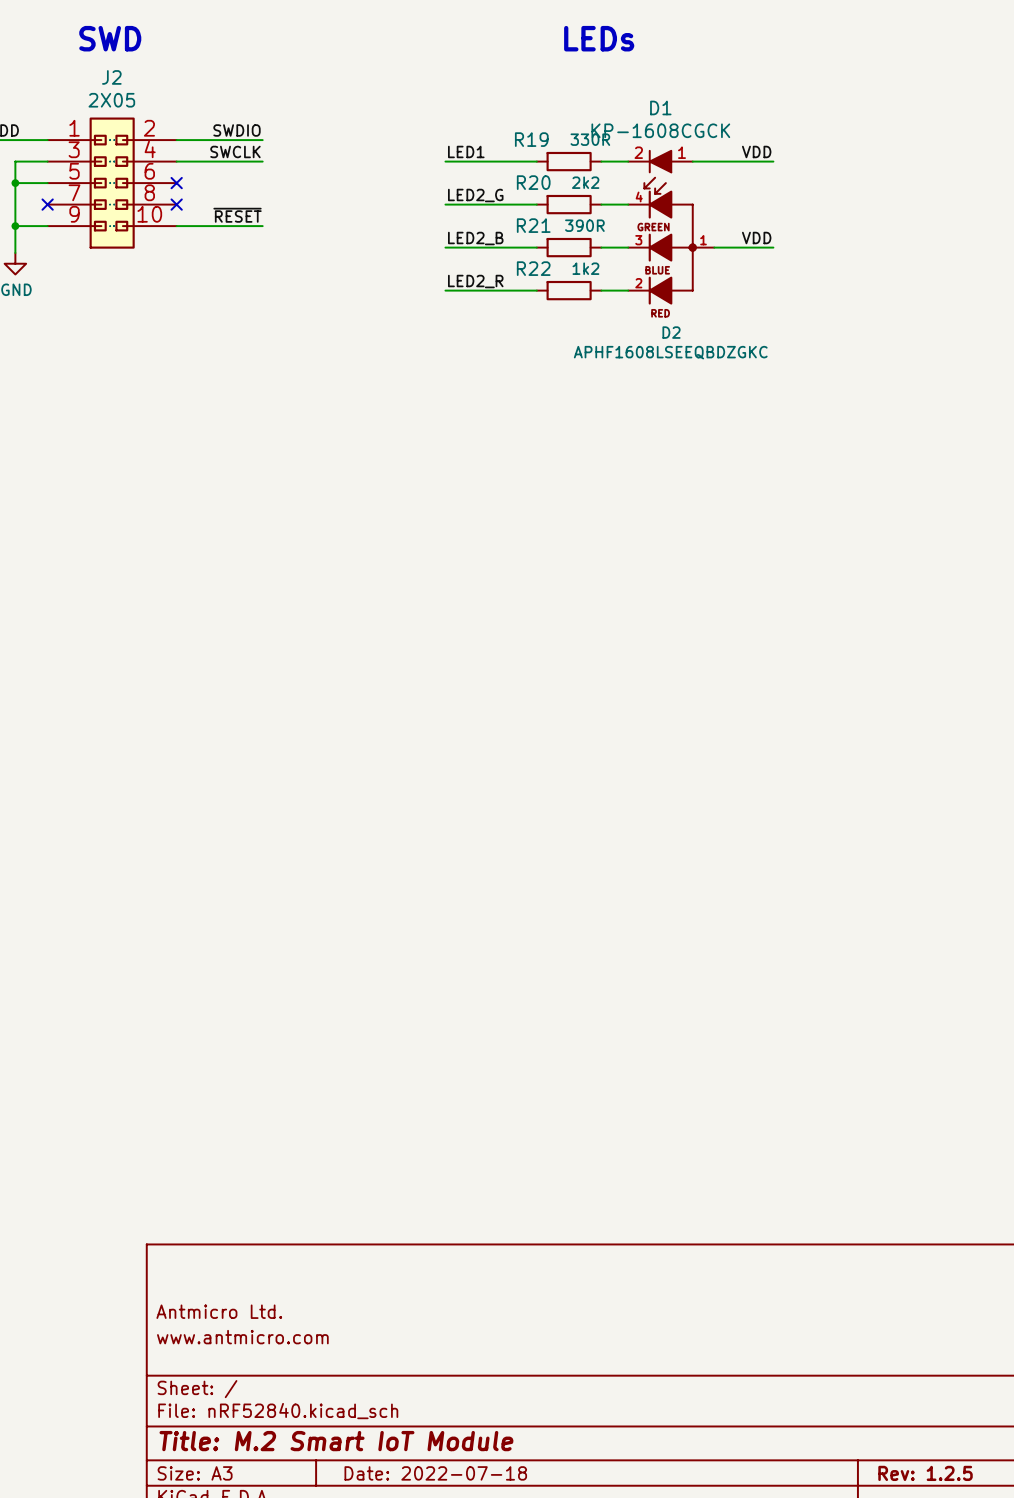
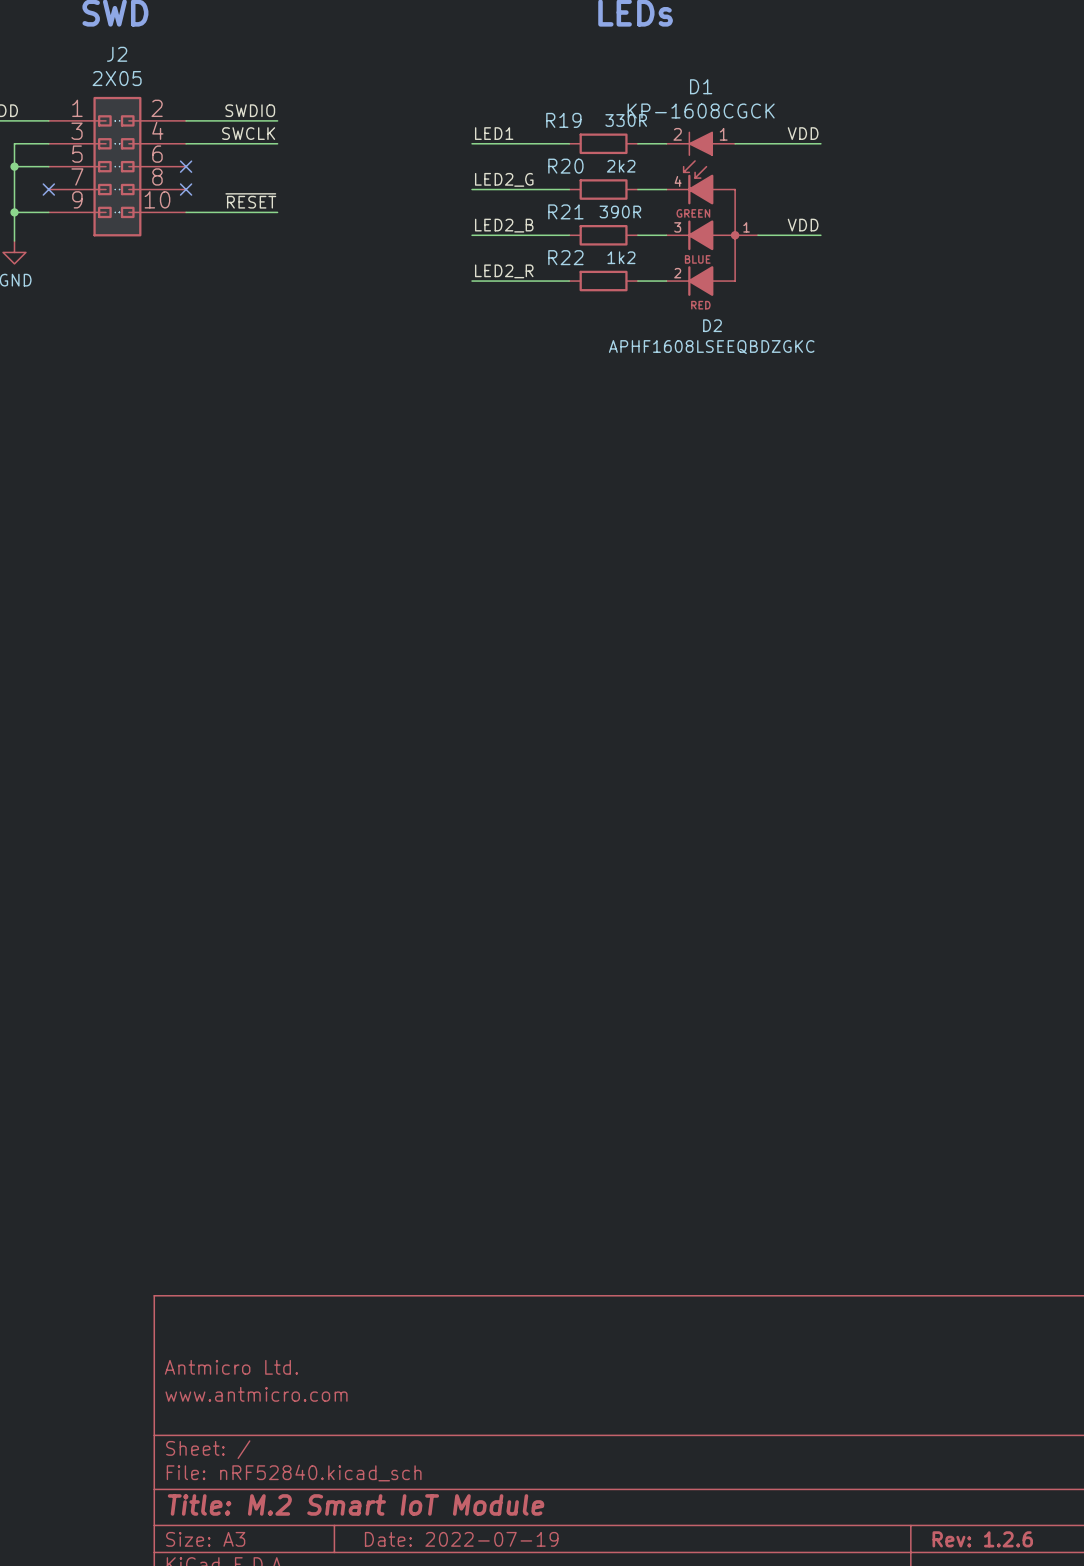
title block: Date: 2022-07-18 (435, 1473) -> Date: 2022-07-19 (461, 1539)
title block: Rev: 1.2.5 (925, 1473) -> Rev: 1.2.6 (982, 1539)

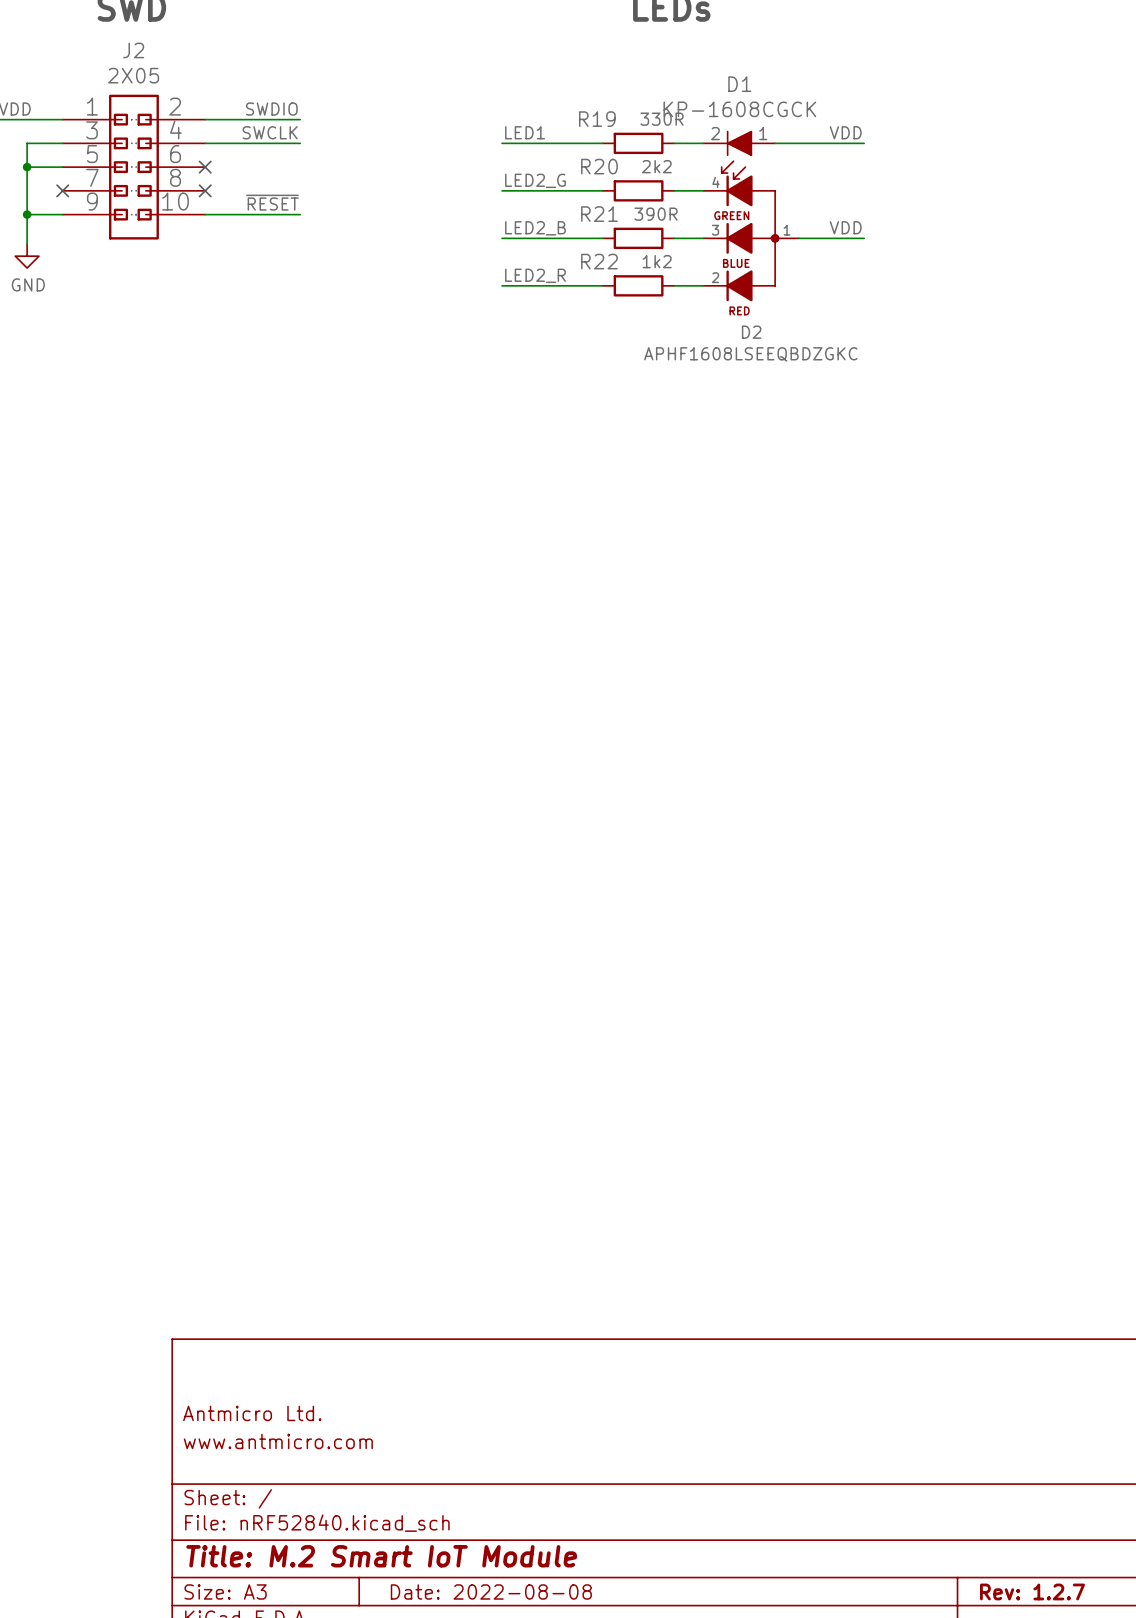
title block: Date: 2022-07-19 (461, 1539) -> Date: 2022-08-08 (491, 1591)
title block: Rev: 1.2.6 (982, 1539) -> Rev: 1.2.7 (1032, 1591)

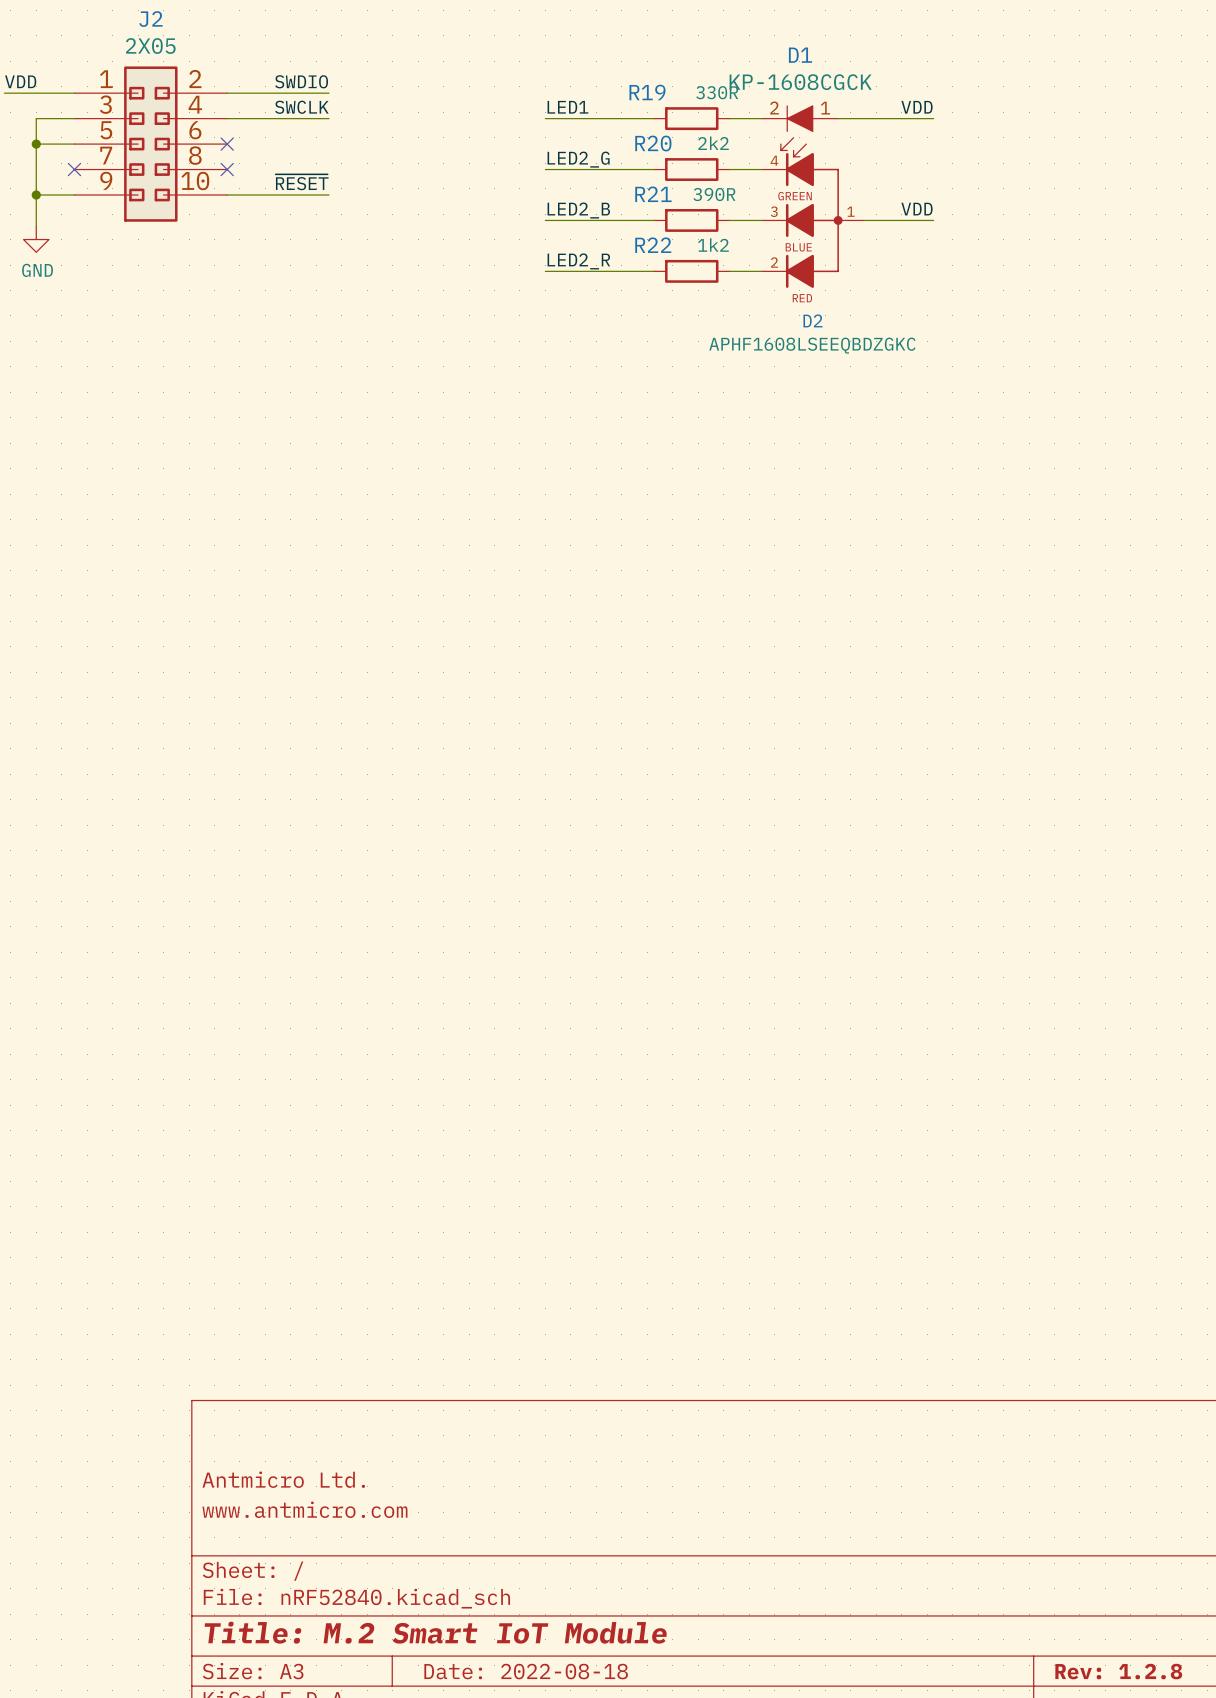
title block: Date: 2022-08-08 (491, 1591) -> Date: 2022-08-18 (526, 1671)
title block: Rev: 1.2.7 (1032, 1591) -> Rev: 1.2.8 (1118, 1671)

